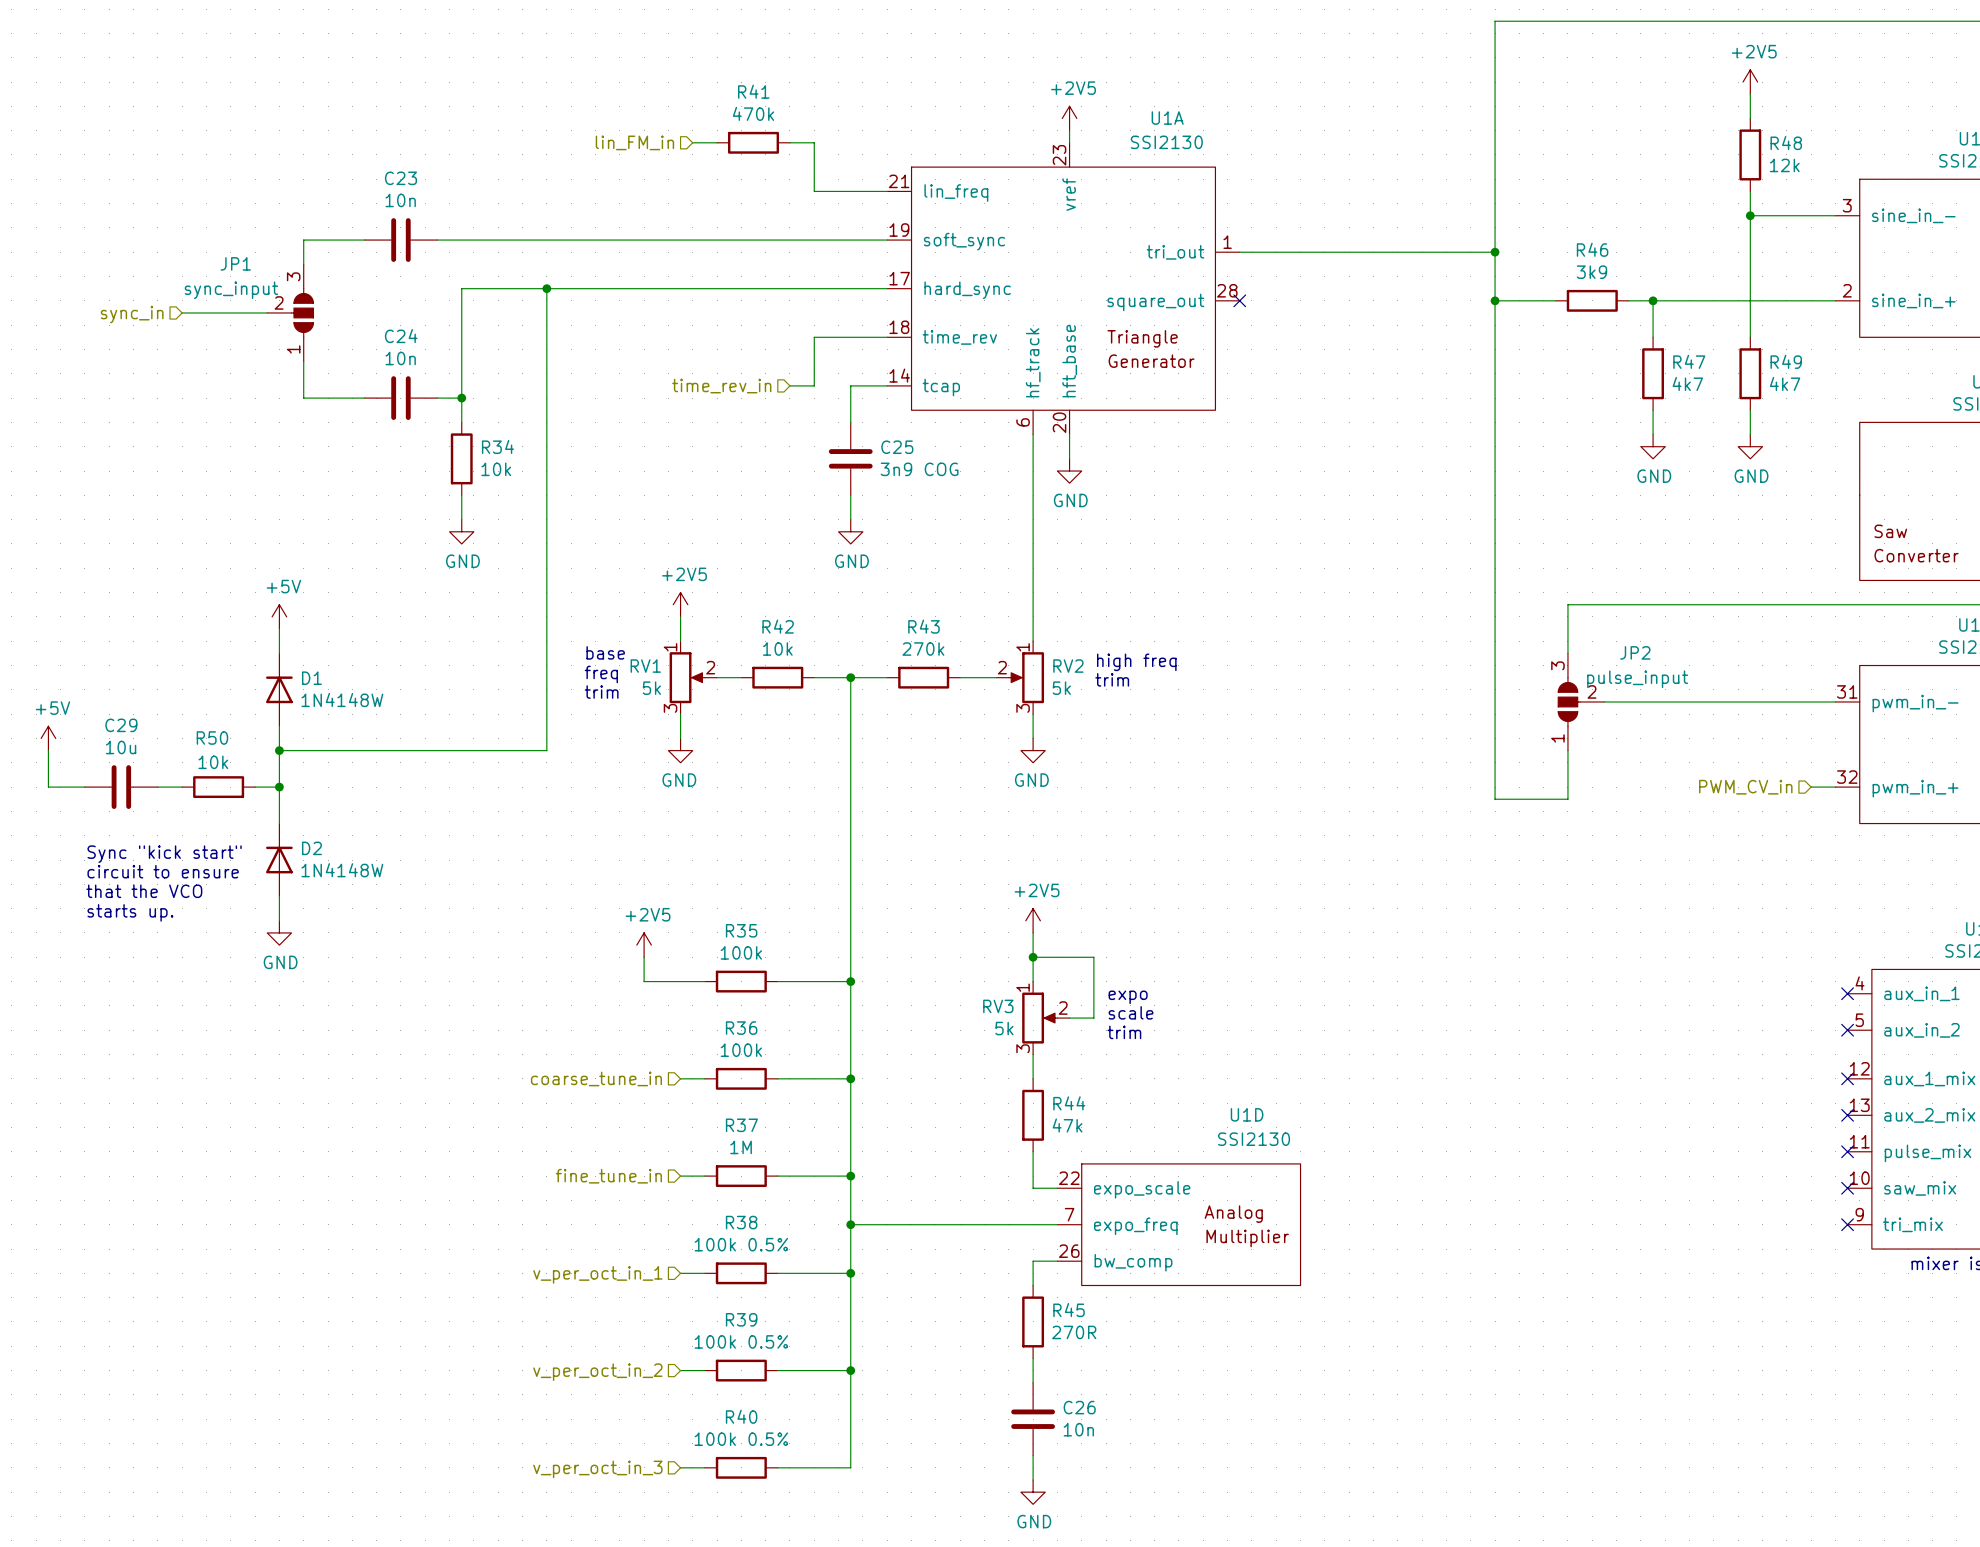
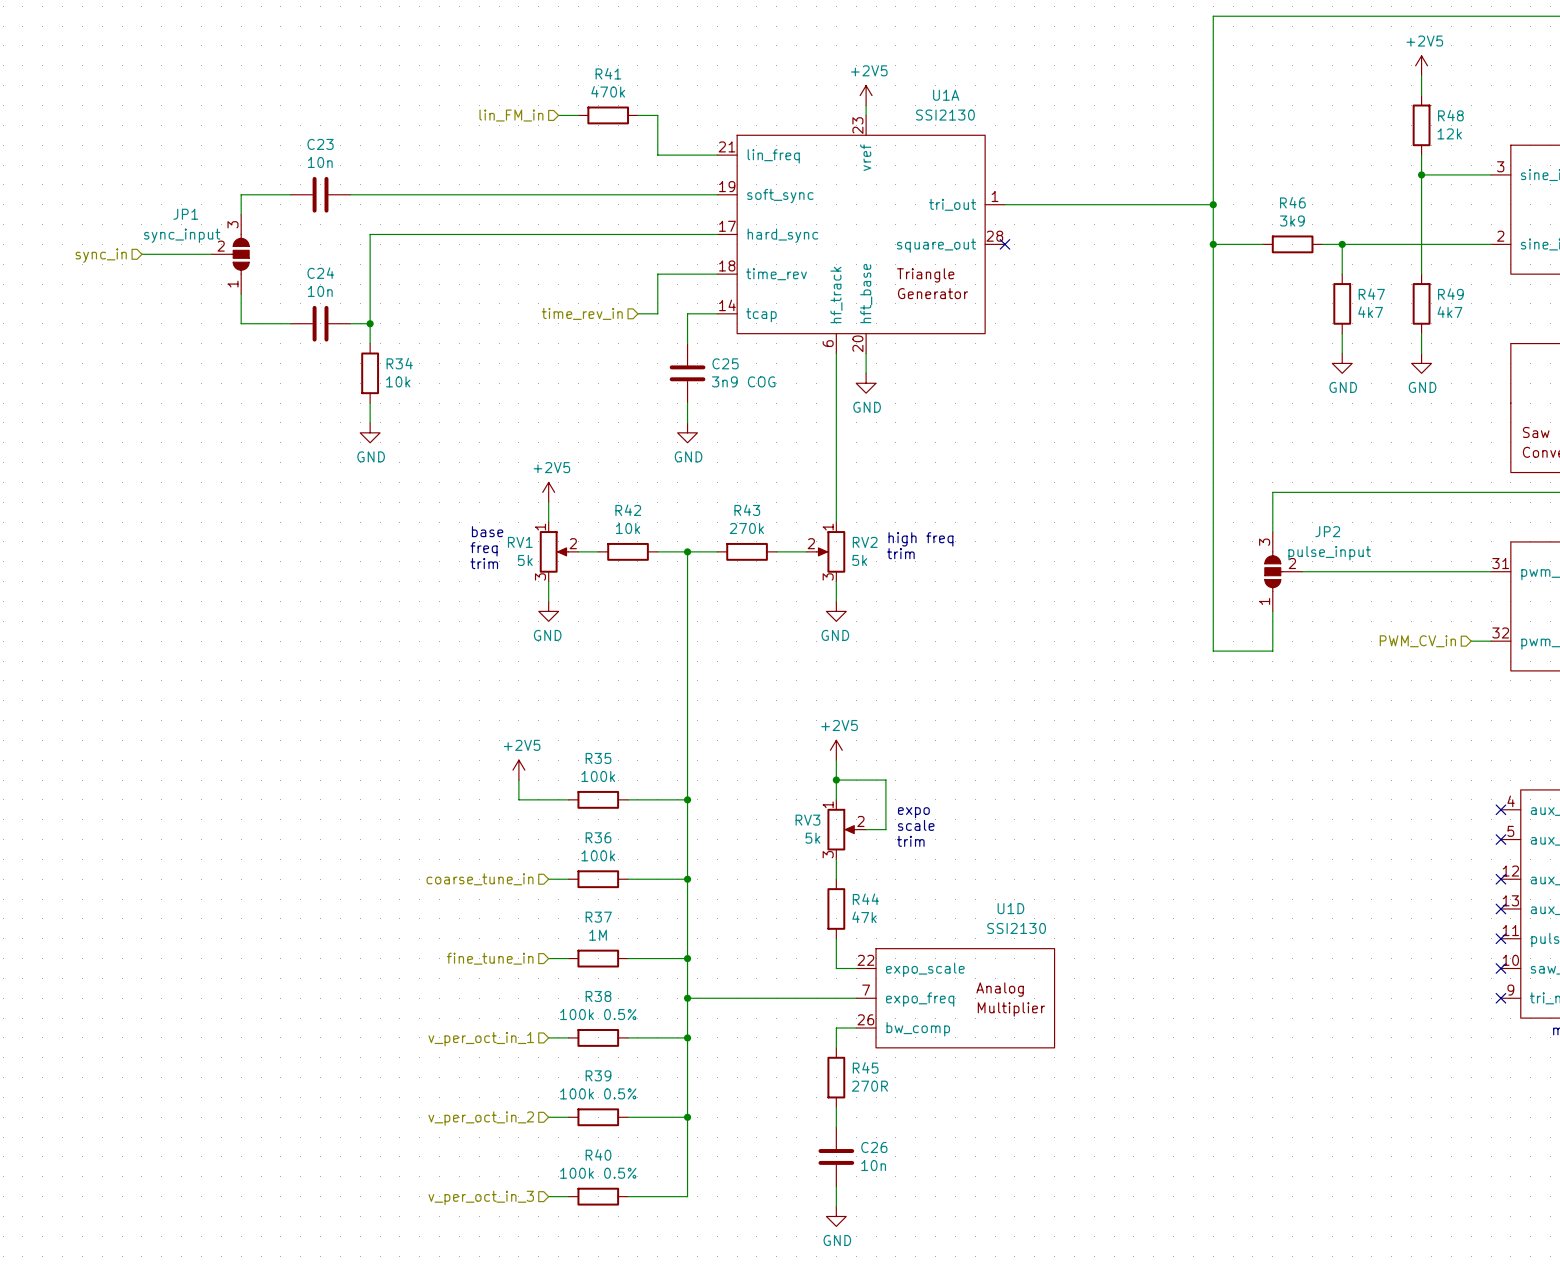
wire: (546, 288) (546, 750) (279, 750) -> none
junction: (546, 288) -> none
power symbol: +5V (279, 616) -> none
wire: (279, 629) (279, 653) -> none
D1: 1N4148W (279, 689) -> none
wire: (279, 726) (279, 823) -> none
power symbol: +5V (48, 738) -> none
wire: (48, 750) (48, 787) (84, 787) -> none
junction: (279, 750) -> none
C29: 10u (121, 787) -> none
wire: (157, 787) (182, 787) -> none
R50: 10k (218, 787) -> none
wire: (255, 787) (279, 787) -> none
junction: (279, 787) -> none
text: Sync "kick start" (164, 854) -> none
D2: 1N4148W (279, 860) -> none
text: circuit to ensure (163, 871) -> none
text: that the VCO (144, 891) -> none
wire: (279, 896) (279, 920) -> none
text: starts up. (130, 912) -> none
power symbol: GND (279, 932) -> none

